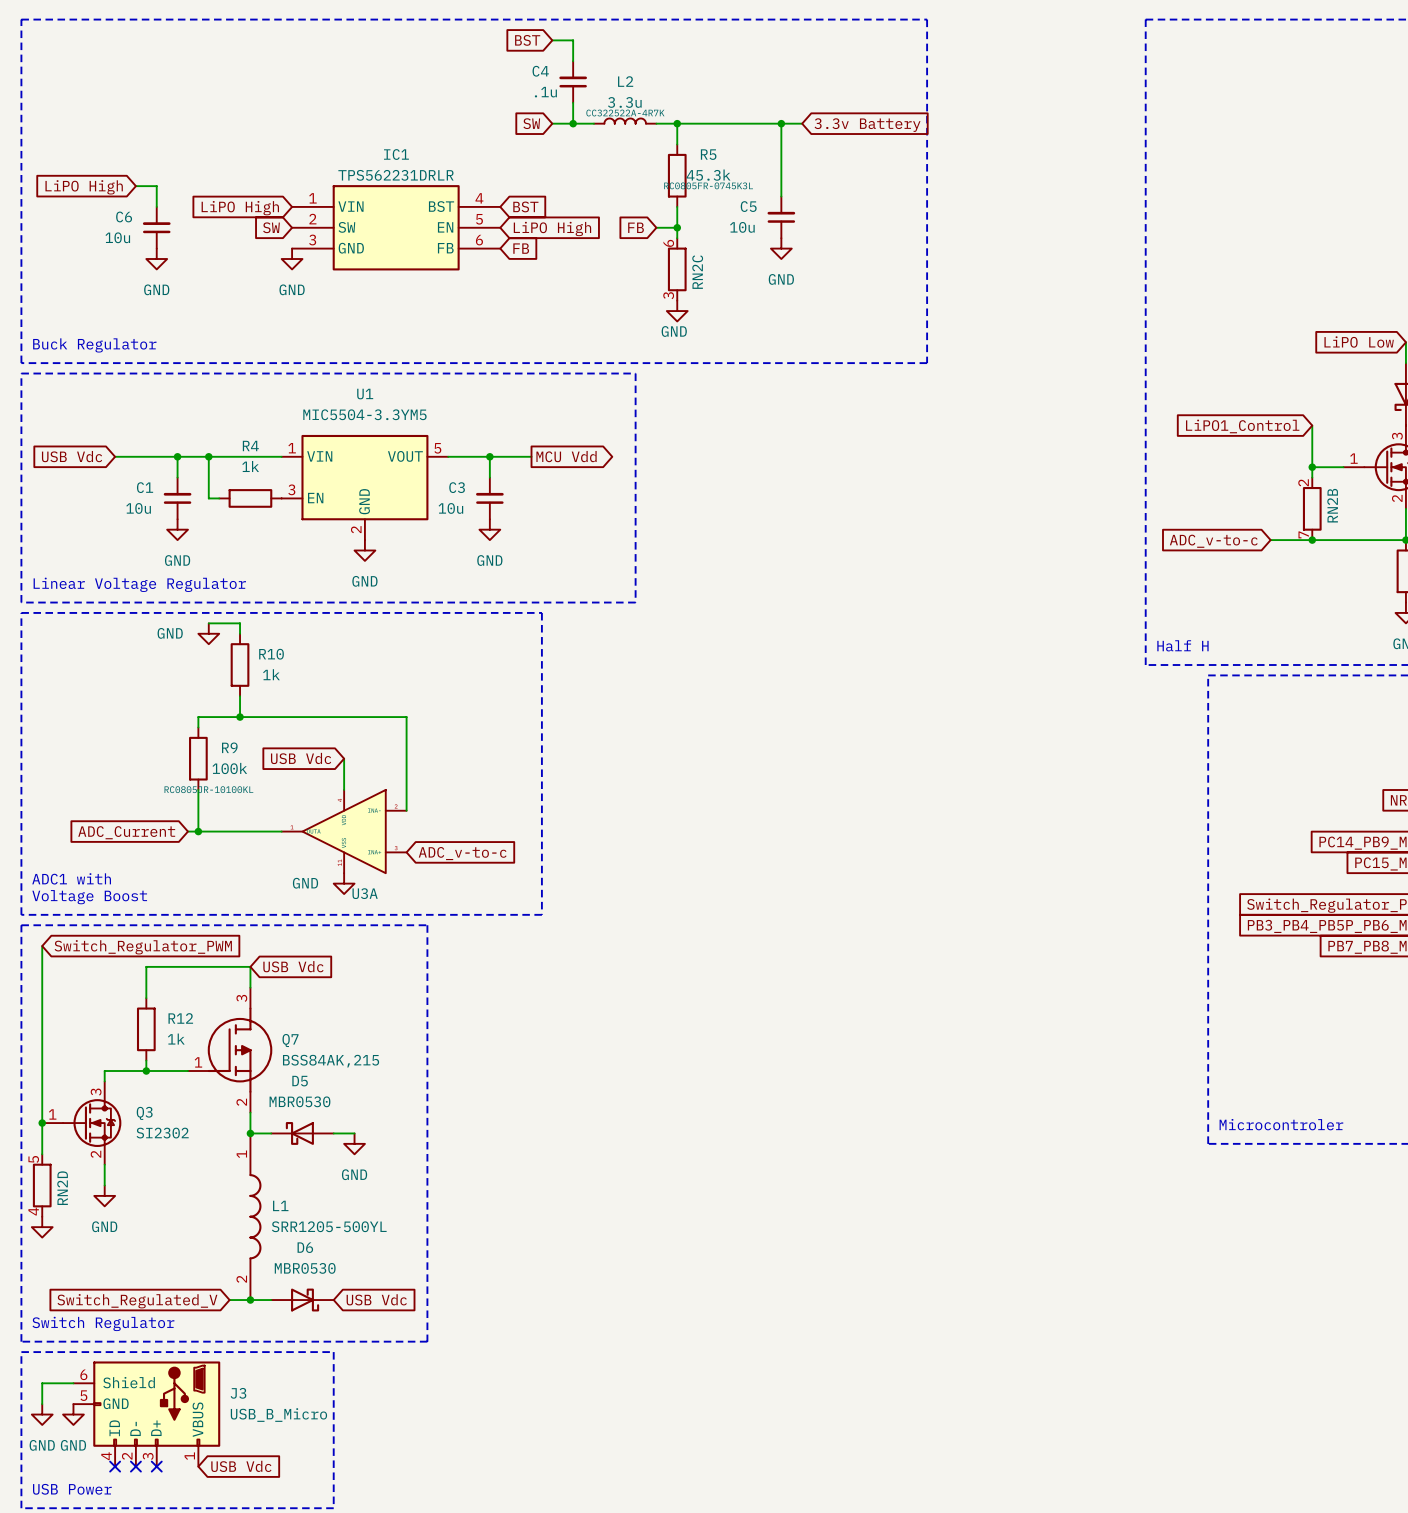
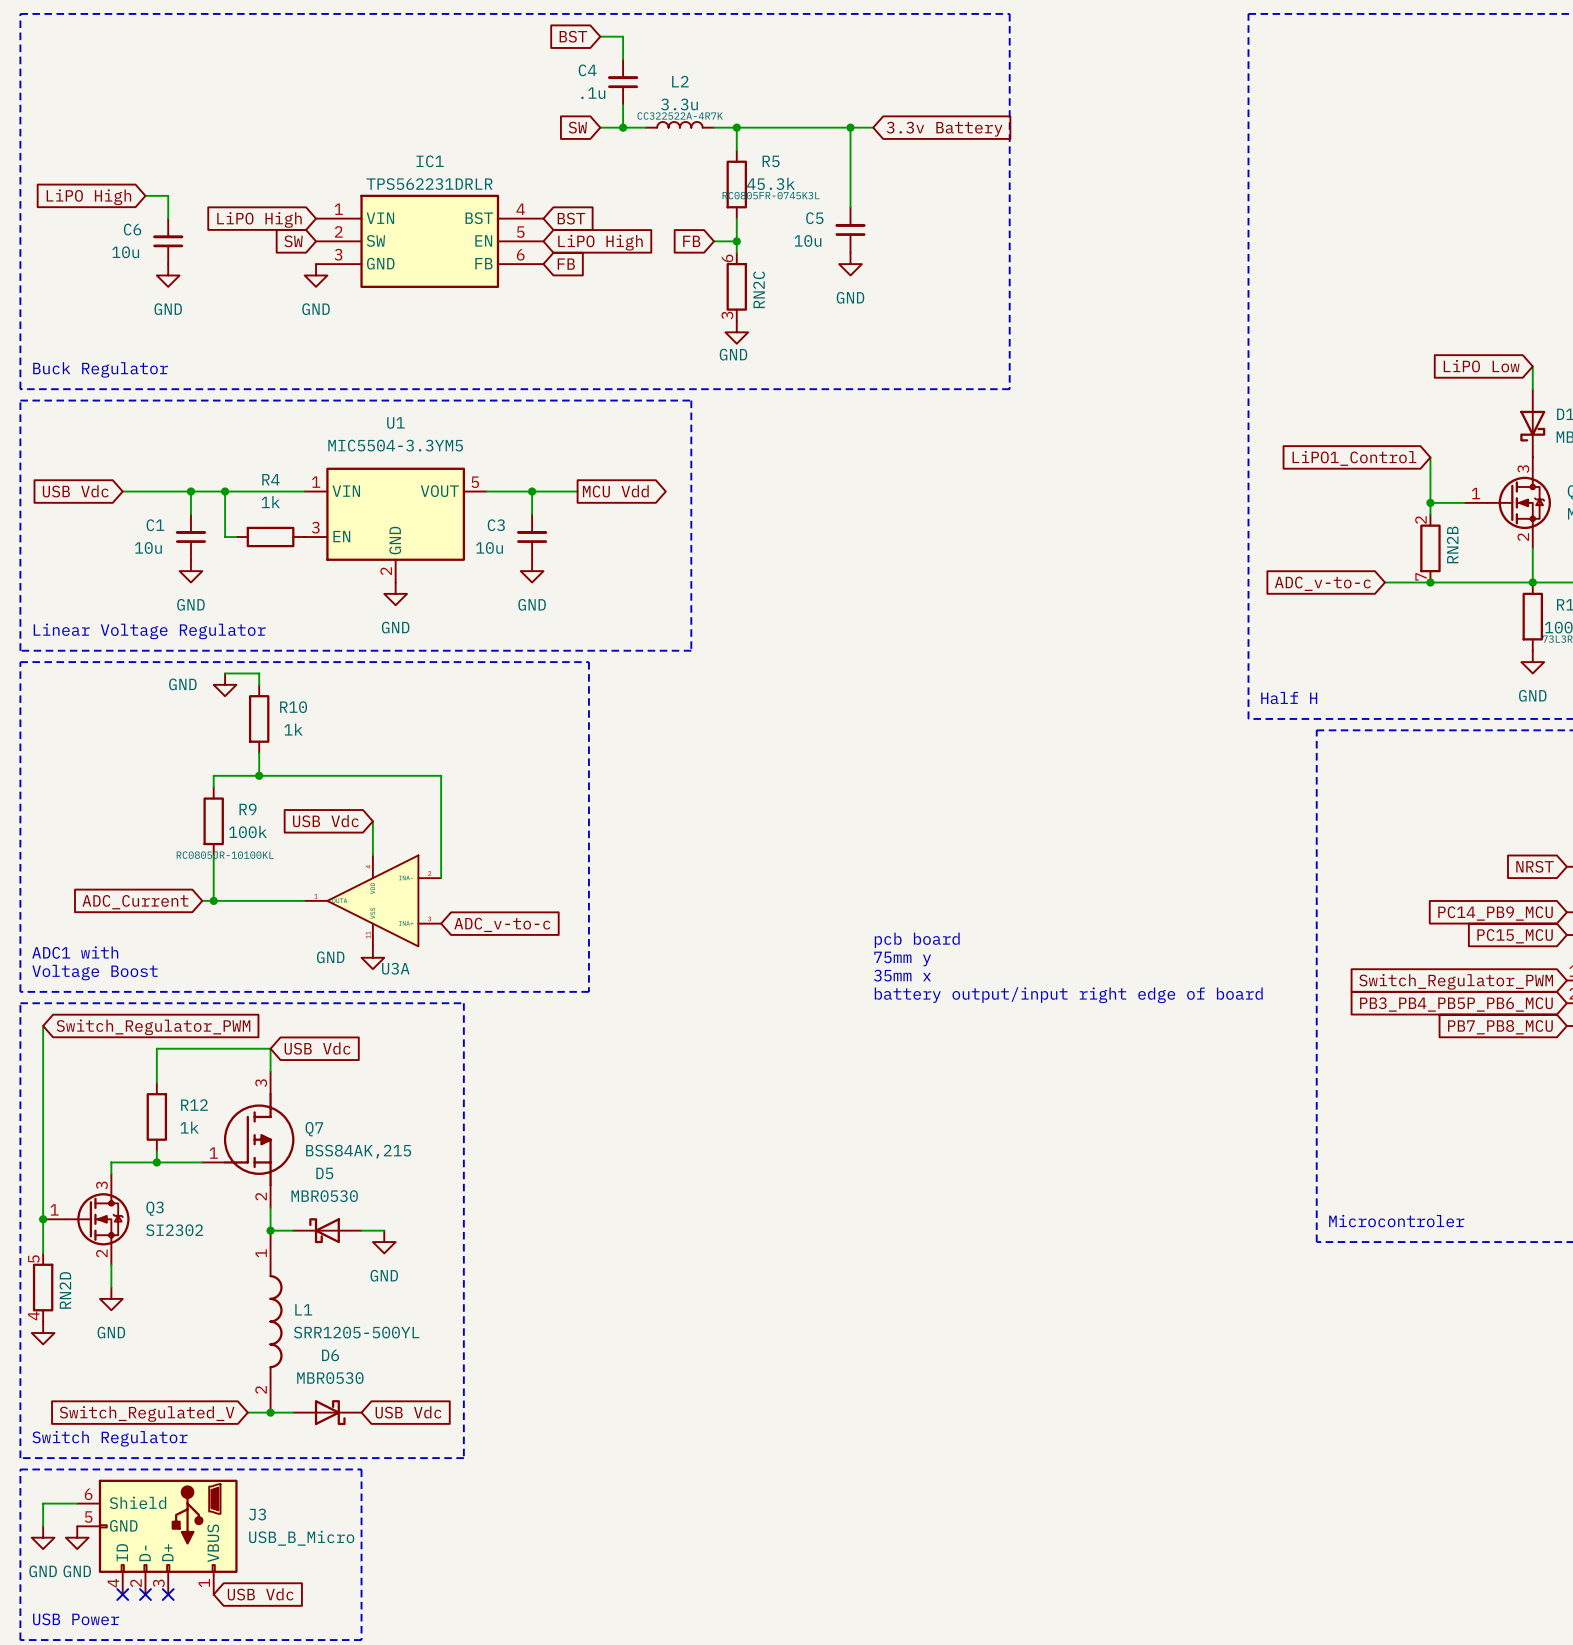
text: none -> pcb board (917, 940)
text: none -> 75mm y (902, 958)
text: none -> 35mm x (902, 975)
text: none -> battery output/input right edge of board (1068, 995)

